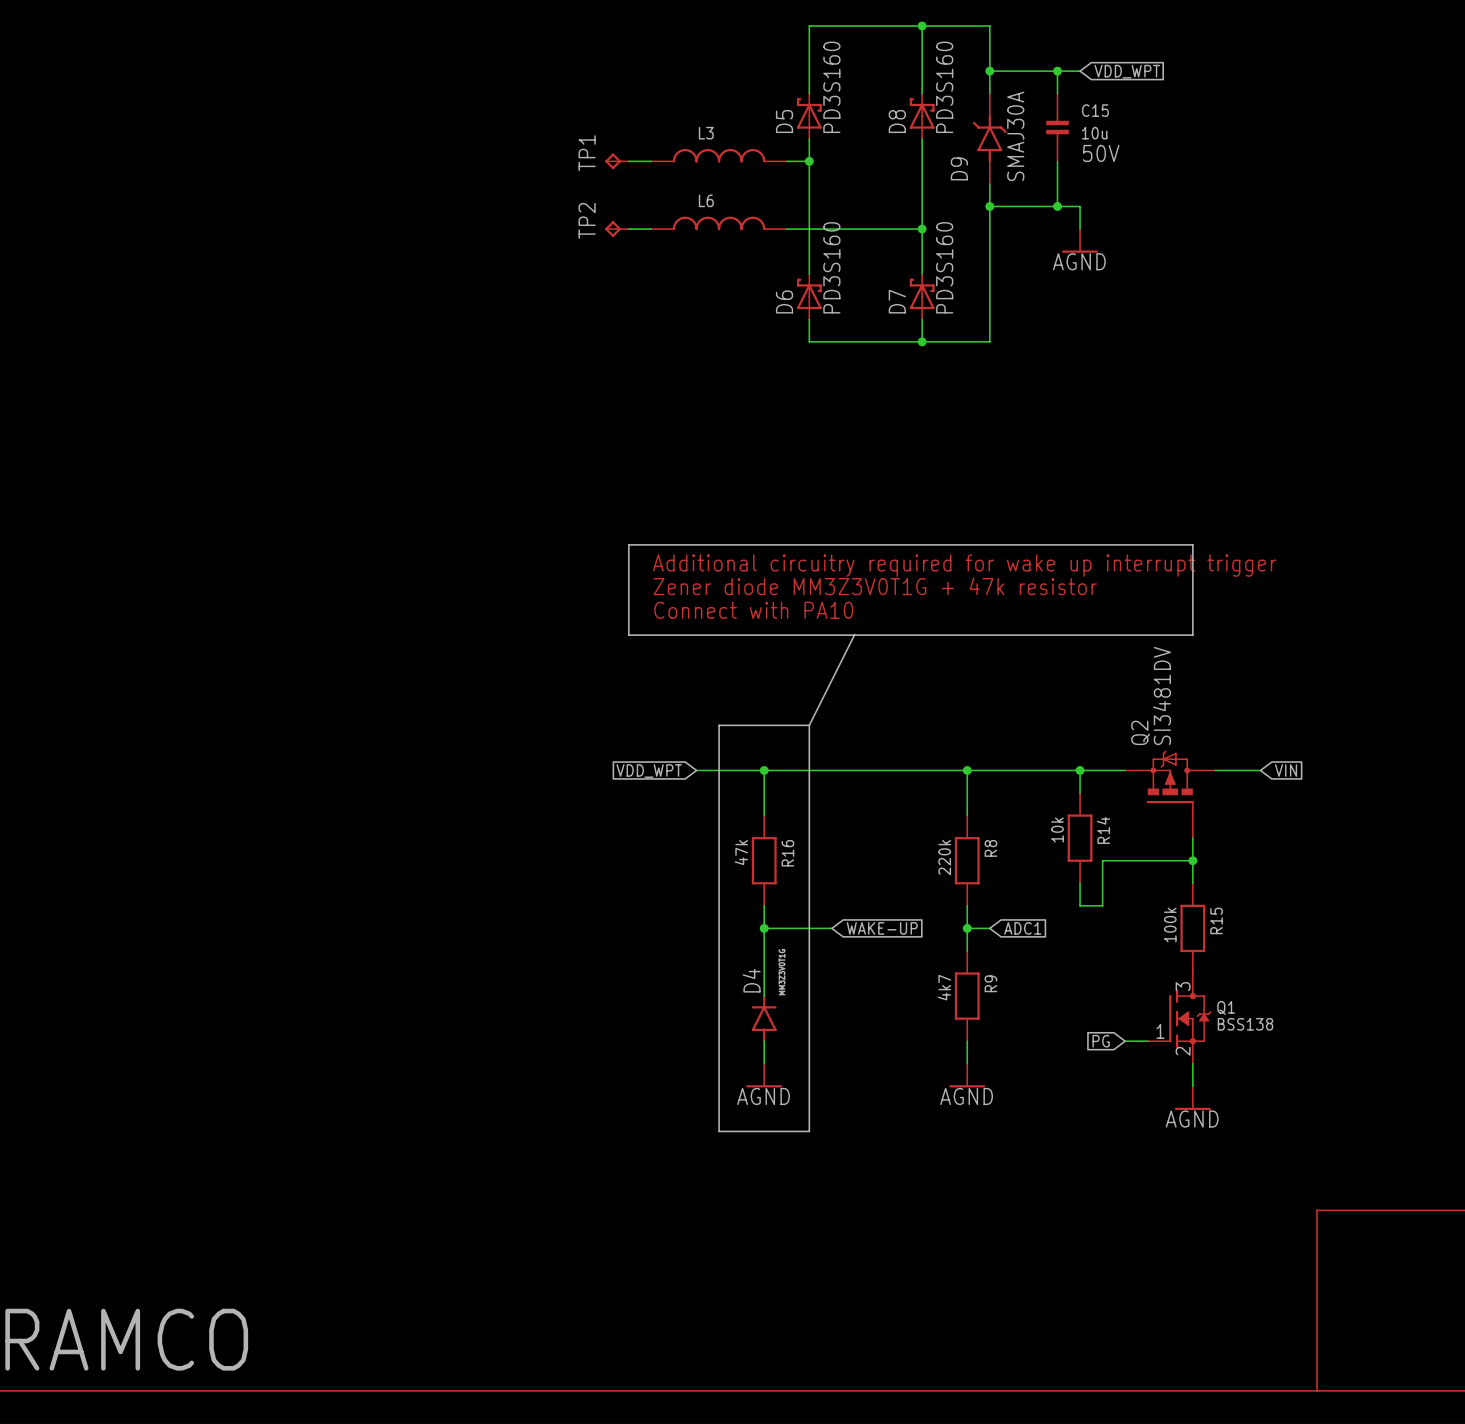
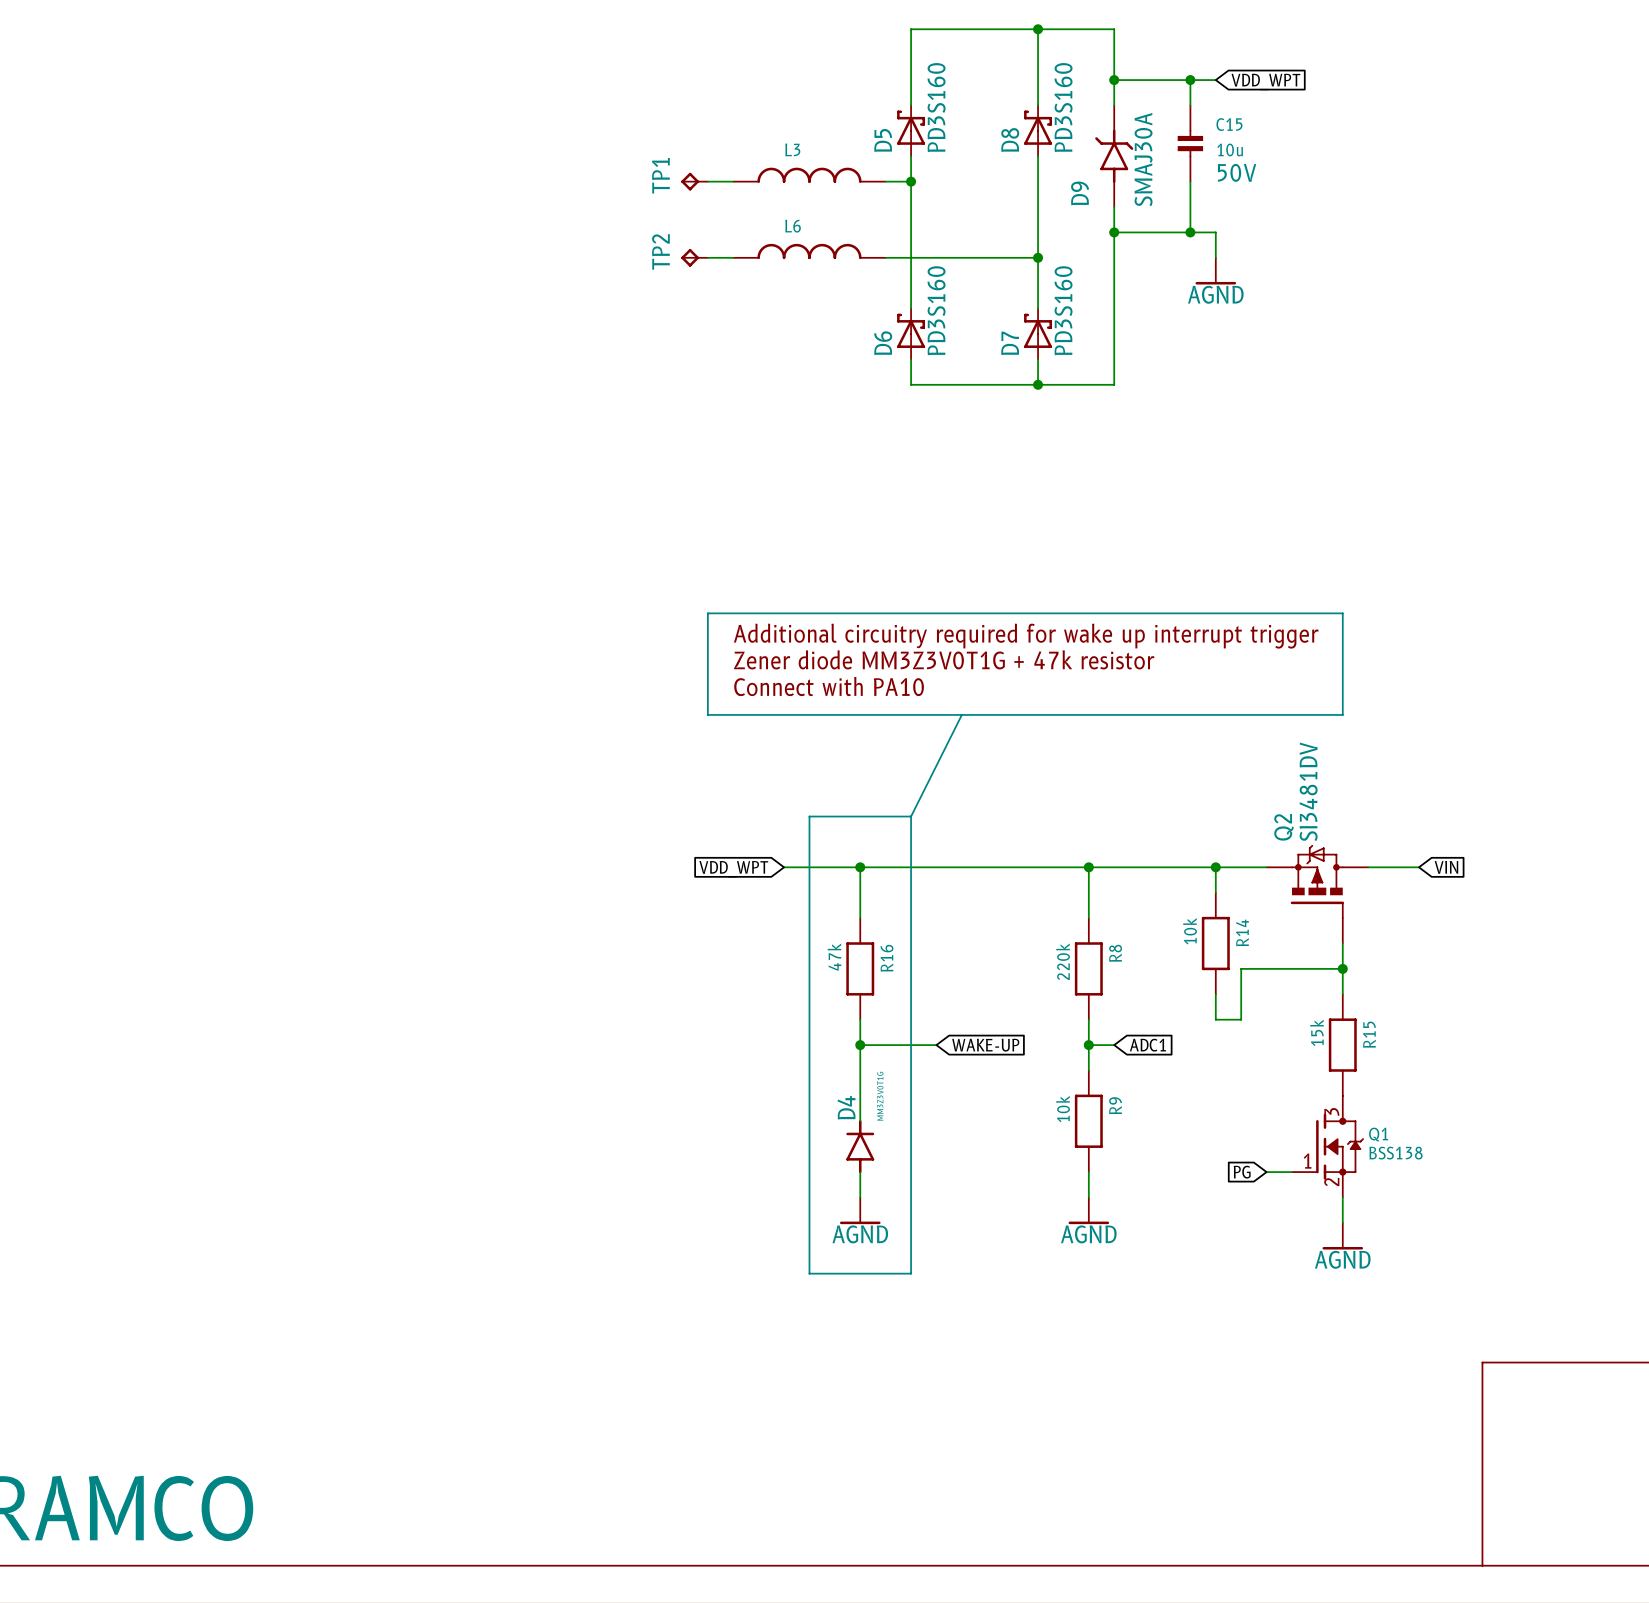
R15 value: 100k (1170, 925) -> 15k (1316, 1032)
R9 value: 4k7 (944, 987) -> 10k (1063, 1109)

